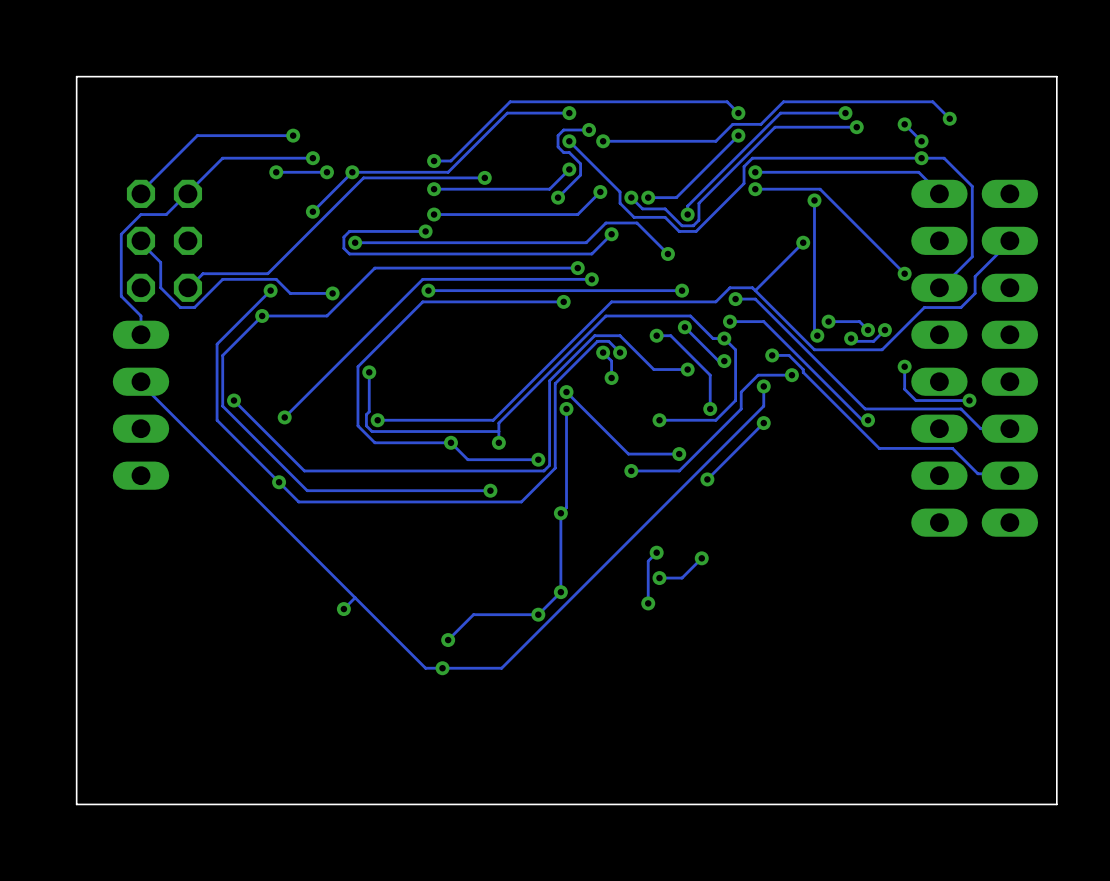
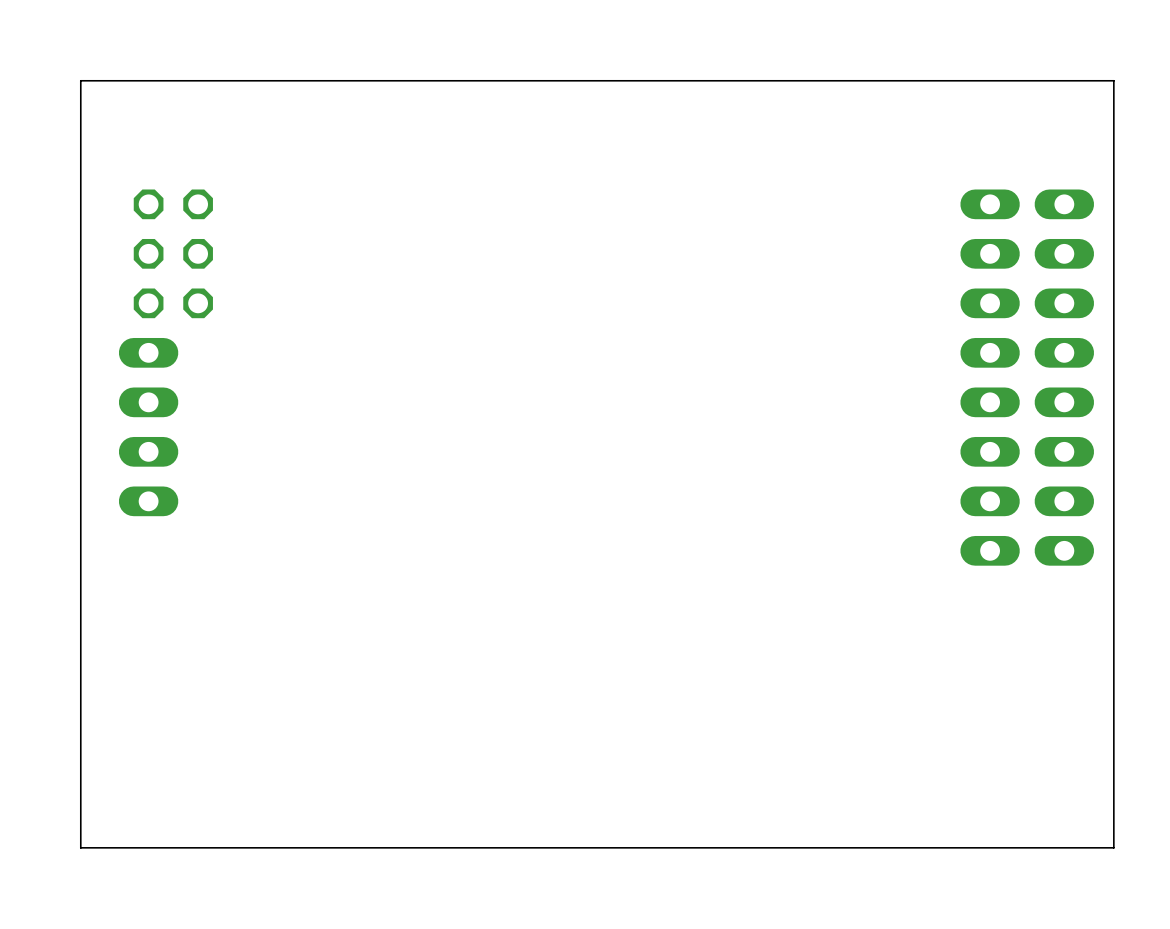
track: (569, 113) (507, 113) (448, 172) (352, 172) (312, 211) -> none
via: (569, 113) -> none
track: (738, 113) (727, 101) (510, 101) (450, 161) (434, 161) -> none
via: (738, 113) -> none
track: (845, 113) (780, 113) (687, 206) (687, 214) -> none
via: (845, 113) -> none
track: (949, 118) (932, 101) (783, 101) (760, 124) (732, 124) (715, 141) (603, 141) -> none
via: (949, 118) -> none
track: (904, 124) (921, 141) -> none
via: (904, 124) -> none
track: (856, 127) (775, 127) (698, 203) (698, 220) (693, 225) (682, 225) (665, 208) (642, 208) (631, 197) -> none
via: (856, 127) -> none
track: (589, 130) (563, 130) (558, 135) (558, 146) (563, 152) (569, 152) (580, 163) (580, 175) (558, 197) -> none
via: (589, 130) -> none
track: (293, 135) (197, 135) (141, 193) -> none
via: (293, 135) -> none
track: (738, 135) (676, 197) (648, 197) -> none
via: (738, 135) -> none
track: (569, 141) (620, 192) (620, 203) (634, 217) (665, 217) (679, 231) (696, 231) (744, 183) (744, 166) (752, 158) (944, 158) (972, 186) (972, 256) (939, 287) -> none
via: (569, 141) -> none
via: (603, 141) -> none
via: (921, 141) -> none
track: (312, 158) (222, 158) (166, 214) (141, 214) (121, 234) (121, 296) (141, 315) (141, 334) -> none
via: (312, 158) -> none
via: (921, 158) -> none
via: (434, 161) -> none
track: (569, 169) (549, 189) (434, 189) -> none
via: (569, 169) -> none
via: (276, 172) -> none
track: (326, 172) (276, 172) -> none
via: (326, 172) -> none
via: (352, 172) -> none
track: (755, 172) (918, 172) (939, 193) -> none
via: (755, 172) -> none
track: (484, 177) (363, 177) (267, 273) (202, 273) (187, 287) -> none
via: (484, 177) -> none
via: (434, 189) -> none
track: (755, 189) (820, 189) (904, 273) -> none
via: (755, 189) -> none
track: (600, 192) (577, 214) (434, 214) -> none
via: (600, 192) -> none
via: (558, 197) -> none
via: (631, 197) -> none
via: (648, 197) -> none
track: (814, 200) (814, 332) (817, 335) -> none
via: (814, 200) -> none
via: (312, 211) -> none
via: (434, 214) -> none
via: (687, 214) -> none
track: (425, 231) (349, 231) (343, 237) (343, 248) (349, 253) (591, 253) (611, 234) -> none
via: (425, 231) -> none
via: (611, 234) -> none
track: (141, 240) (160, 262) (160, 287) (180, 307) (194, 307) (222, 279) (276, 279) (290, 293) (332, 293) -> none
track: (1009, 240) (975, 276) (975, 293) (961, 307) (924, 307) (882, 349) (814, 349) (752, 287) (729, 287) (715, 301) (611, 301) (493, 420) (377, 420) -> none
track: (355, 242) (586, 242) (605, 223) (636, 223) (667, 253) -> none
via: (355, 242) -> none
track: (803, 242) (755, 290) -> none
via: (803, 242) -> none
via: (667, 253) -> none
track: (577, 268) (374, 268) (326, 315) (262, 315) (222, 355) (222, 406) (307, 490) (490, 490) -> none
via: (577, 268) -> none
via: (904, 273) -> none
track: (591, 279) (422, 279) (284, 417) -> none
via: (591, 279) -> none
track: (270, 290) (217, 344) (217, 420) (298, 501) (521, 501) (555, 468) (555, 383) (597, 341) (608, 341) (620, 352) -> none
via: (270, 290) -> none
via: (428, 290) -> none
track: (682, 290) (428, 290) -> none
via: (682, 290) -> none
via: (332, 293) -> none
track: (735, 299) (755, 299) (865, 408) (961, 408) (980, 428) (1009, 428) -> none
via: (735, 299) -> none
track: (563, 301) (422, 301) (357, 366) (357, 425) (374, 442) (450, 442) (467, 459) (538, 459) -> none
via: (563, 301) -> none
via: (262, 315) -> none
track: (729, 321) (763, 321) (862, 420) (868, 420) -> none
via: (729, 321) -> none
track: (828, 321) (859, 321) (868, 330) -> none
via: (828, 321) -> none
track: (684, 327) (718, 361) (724, 361) -> none
via: (684, 327) -> none
via: (868, 330) -> none
track: (884, 330) (873, 341) (853, 341) (851, 338) -> none
via: (884, 330) -> none
track: (656, 335) (670, 335) (710, 375) (710, 408) -> none
via: (656, 335) -> none
via: (817, 335) -> none
via: (724, 338) -> none
via: (851, 338) -> none
track: (603, 352) (611, 361) (611, 377) -> none
via: (603, 352) -> none
via: (620, 352) -> none
track: (772, 355) (789, 355) (803, 369) (803, 372) (879, 448) (952, 448) (977, 473) (1008, 473) (1009, 475) -> none
via: (772, 355) -> none
via: (724, 361) -> none
track: (904, 366) (904, 389) (915, 400) (969, 400) -> none
via: (904, 366) -> none
track: (687, 369) (653, 369) (620, 335) (594, 335) (549, 380) (549, 465) (543, 470) (304, 470) (233, 400) -> none
via: (687, 369) -> none
track: (369, 372) (369, 411) (366, 414) (366, 425) (372, 431) (498, 431) -> none
via: (369, 372) -> none
track: (791, 375) (758, 375) (741, 392) (741, 408) (679, 470) (631, 470) -> none
via: (791, 375) -> none
via: (611, 377) -> none
track: (141, 381) (425, 668) (501, 668) (763, 406) (763, 386) -> none
via: (763, 386) -> none
track: (566, 392) (628, 454) (679, 454) -> none
via: (566, 392) -> none
via: (233, 400) -> none
via: (969, 400) -> none
track: (566, 408) (566, 507) (560, 513) (560, 592) (538, 614) (473, 614) (448, 640) -> none
via: (566, 408) -> none
via: (710, 408) -> none
via: (284, 417) -> none
via: (377, 420) -> none
track: (659, 420) (715, 420) (735, 400) (735, 349) (724, 338) (713, 338) (690, 315) (605, 315) (498, 423) (498, 442) -> none
via: (659, 420) -> none
via: (868, 420) -> none
track: (763, 423) (707, 479) -> none
via: (763, 423) -> none
via: (450, 442) -> none
via: (498, 442) -> none
via: (679, 454) -> none
via: (538, 459) -> none
via: (631, 470) -> none
via: (707, 479) -> none
via: (279, 482) -> none
via: (490, 490) -> none
via: (560, 513) -> none
track: (656, 552) (648, 561) (648, 603) -> none
via: (656, 552) -> none
track: (701, 558) (682, 578) (659, 578) -> none
via: (701, 558) -> none
via: (659, 578) -> none
via: (560, 592) -> none
track: (355, 597) (343, 609) -> none
via: (648, 603) -> none
via: (343, 609) -> none
via: (538, 614) -> none
via: (448, 640) -> none
via: (442, 668) -> none

